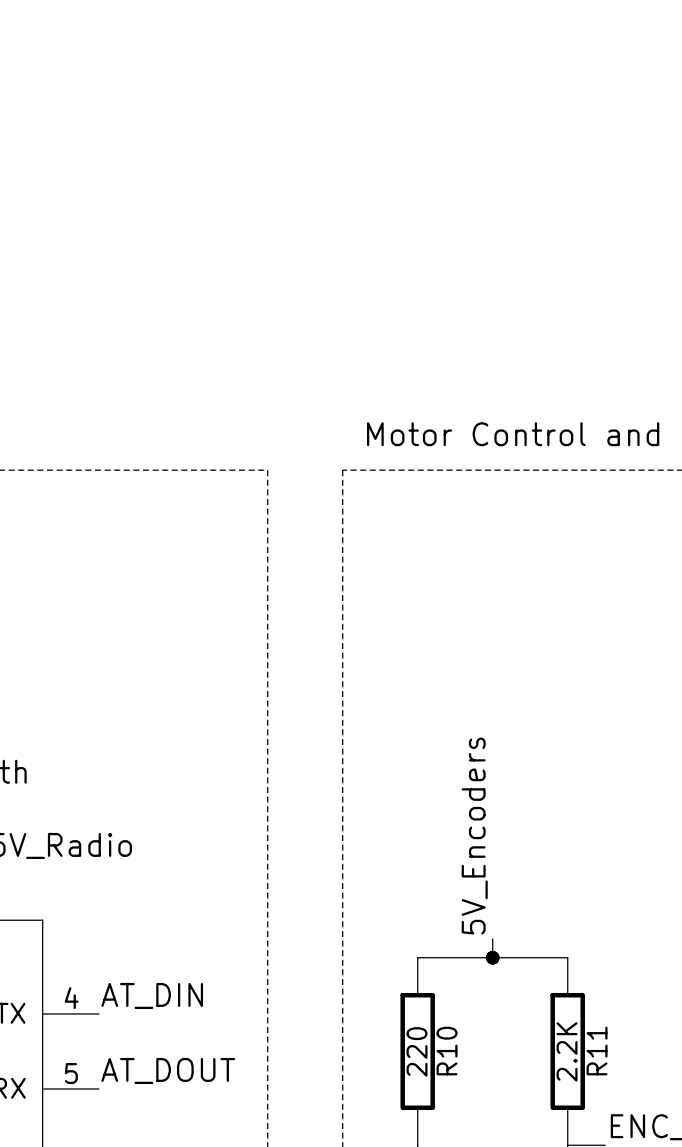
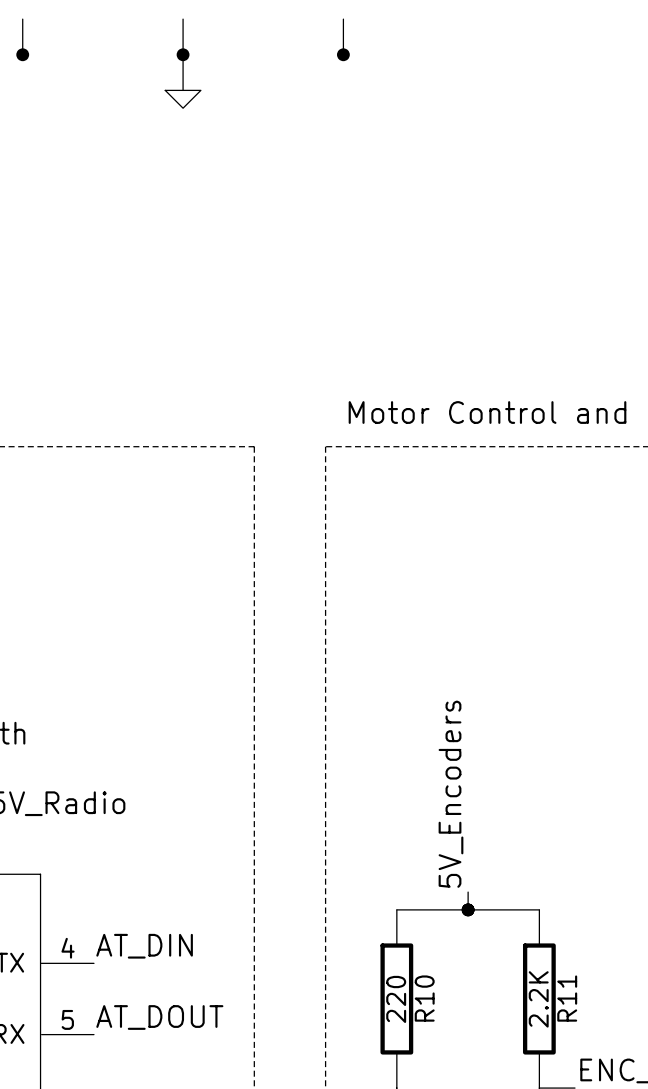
wire: none -> (22, 19) (22, 54)
wire: none -> (183, 19) (183, 90)
wire: none -> (343, 19) (343, 54)
junction: none -> (22, 54)
junction: none -> (183, 54)
junction: none -> (343, 54)
power symbol: none -> (183, 99)

